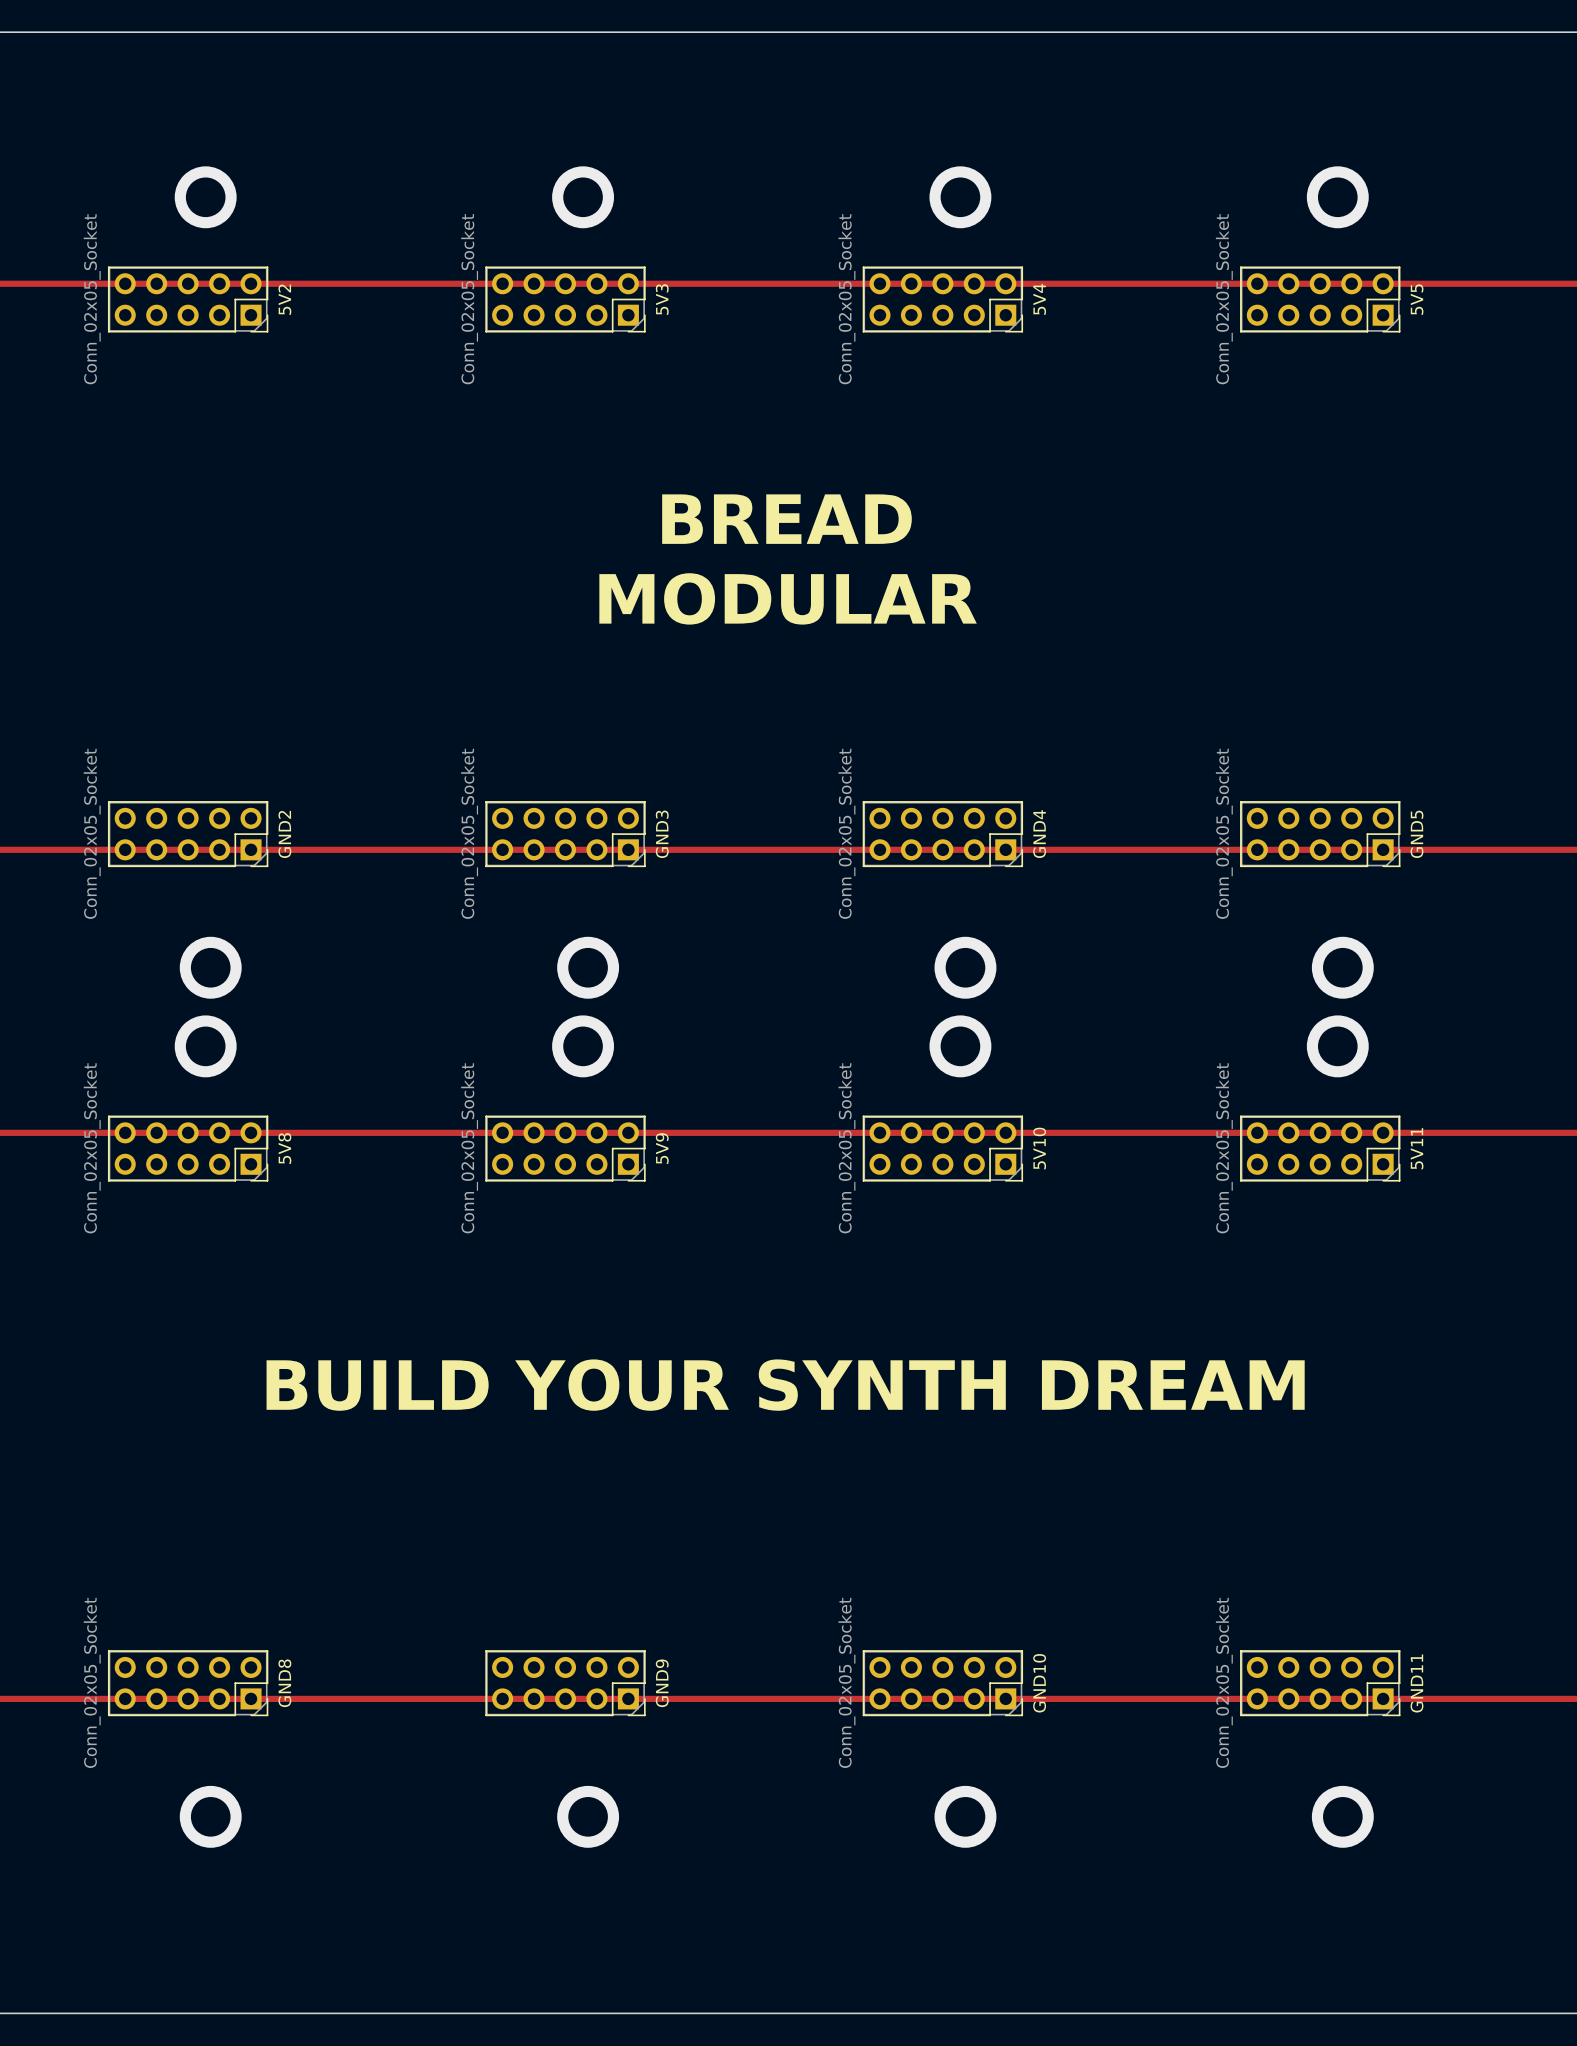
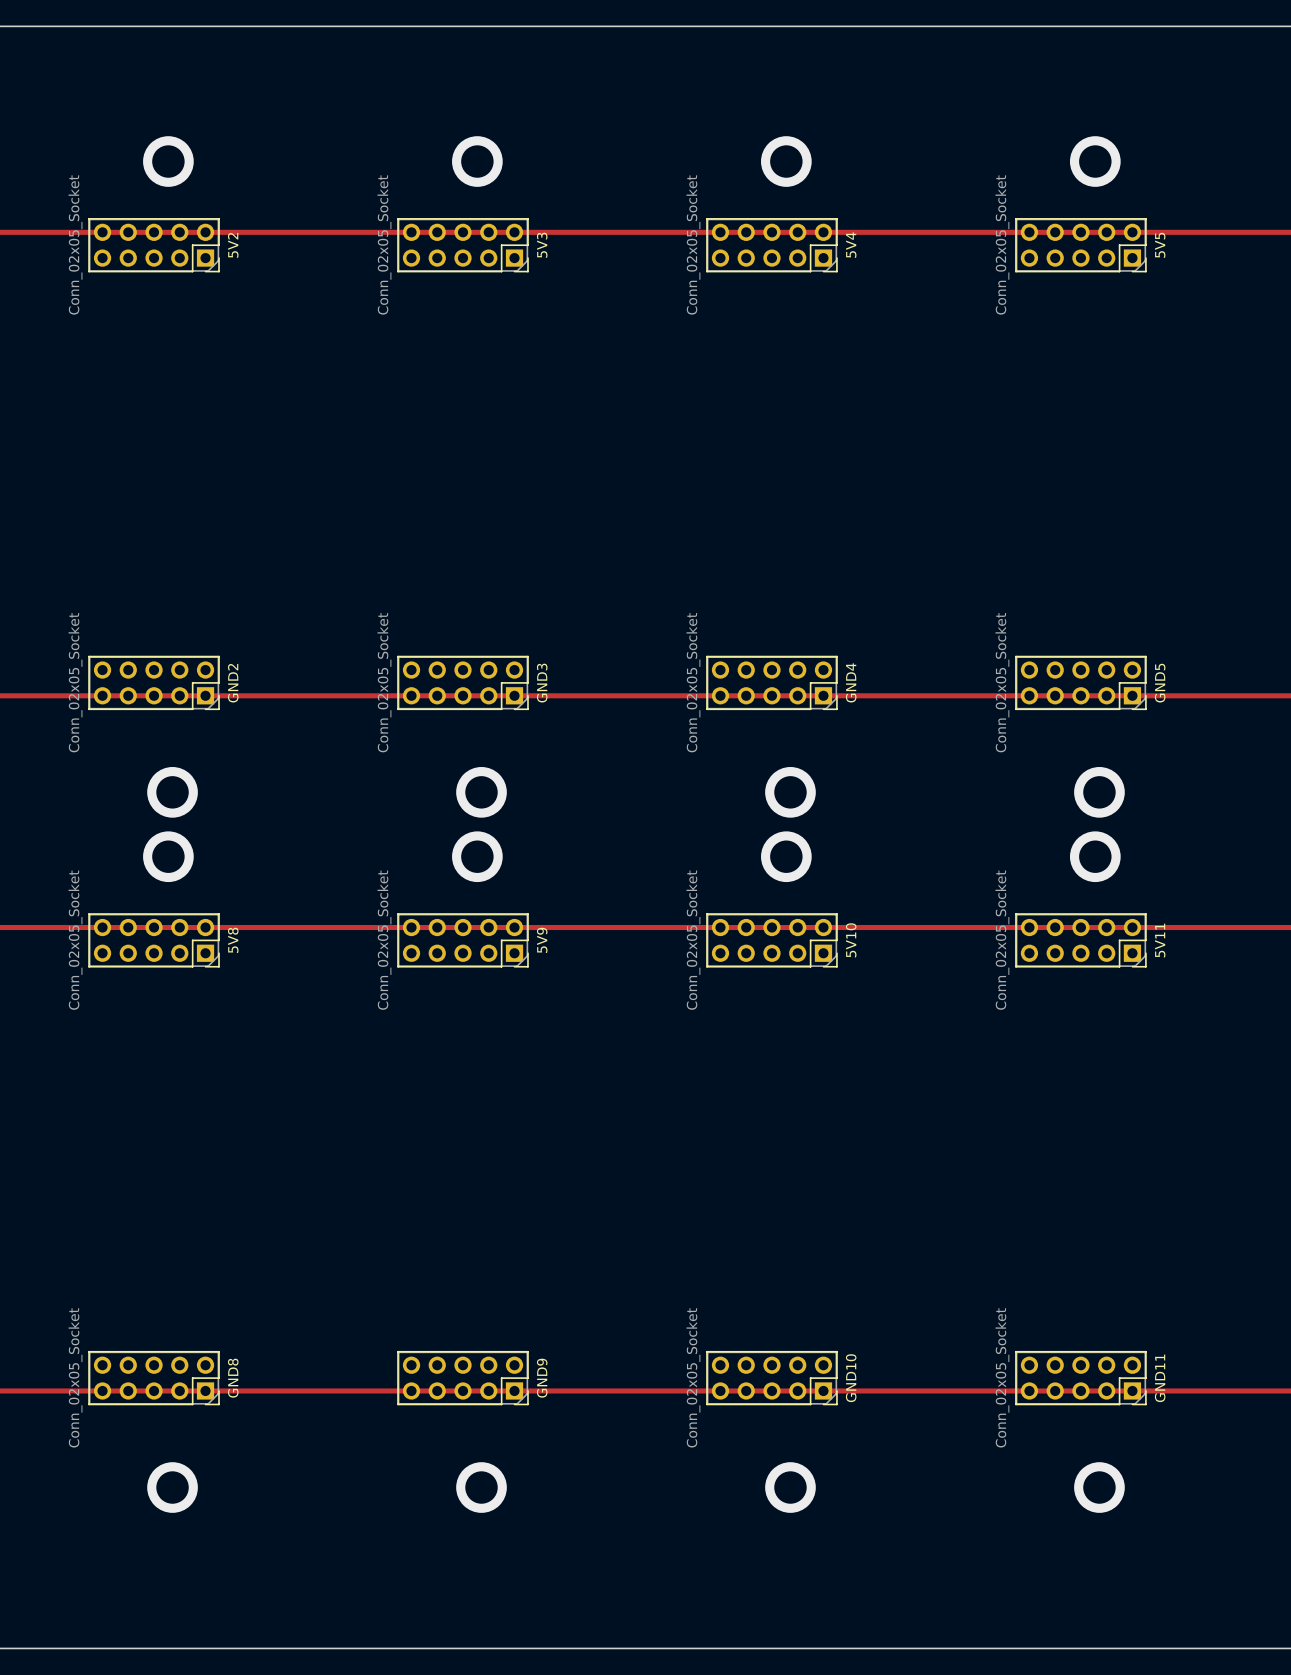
text: BREAD (786, 519) -> none
text: MODULAR (788, 598) -> none
text: BUILD YOUR SYNTH DREAM (785, 1385) -> none

